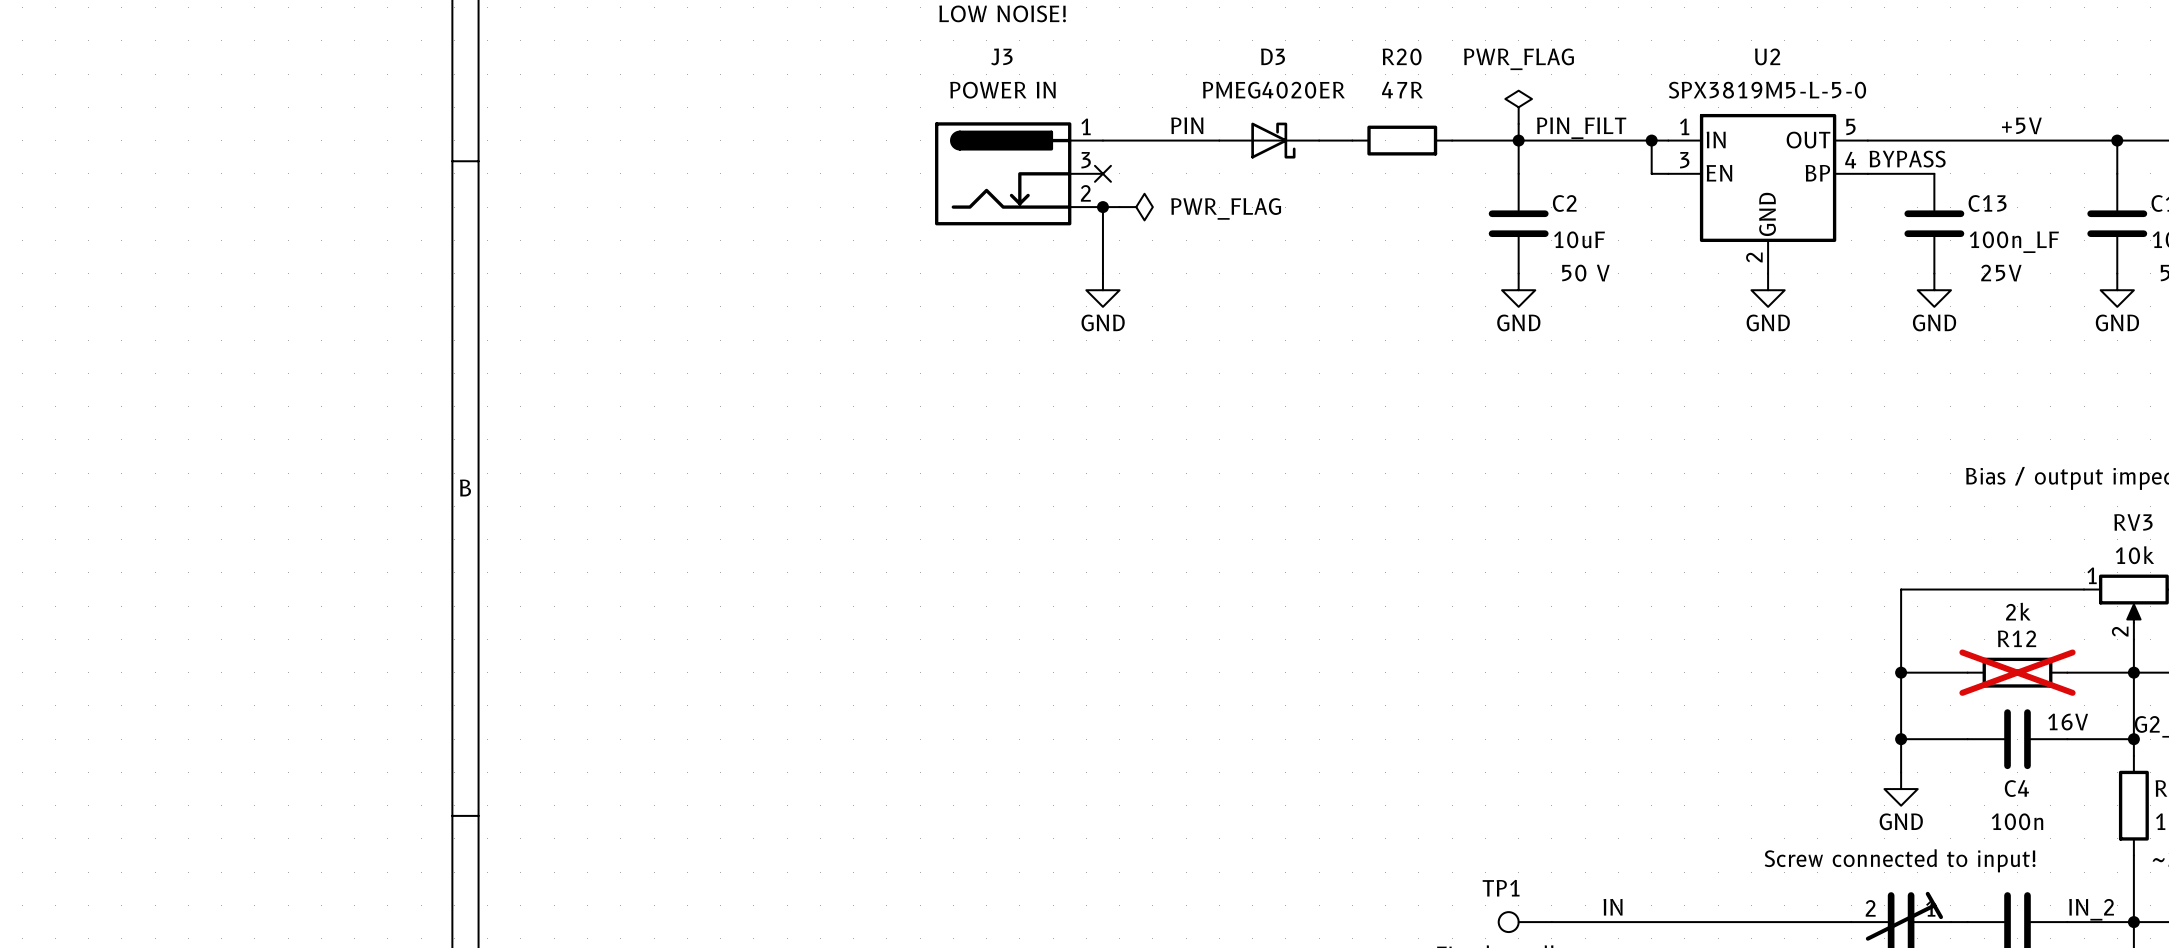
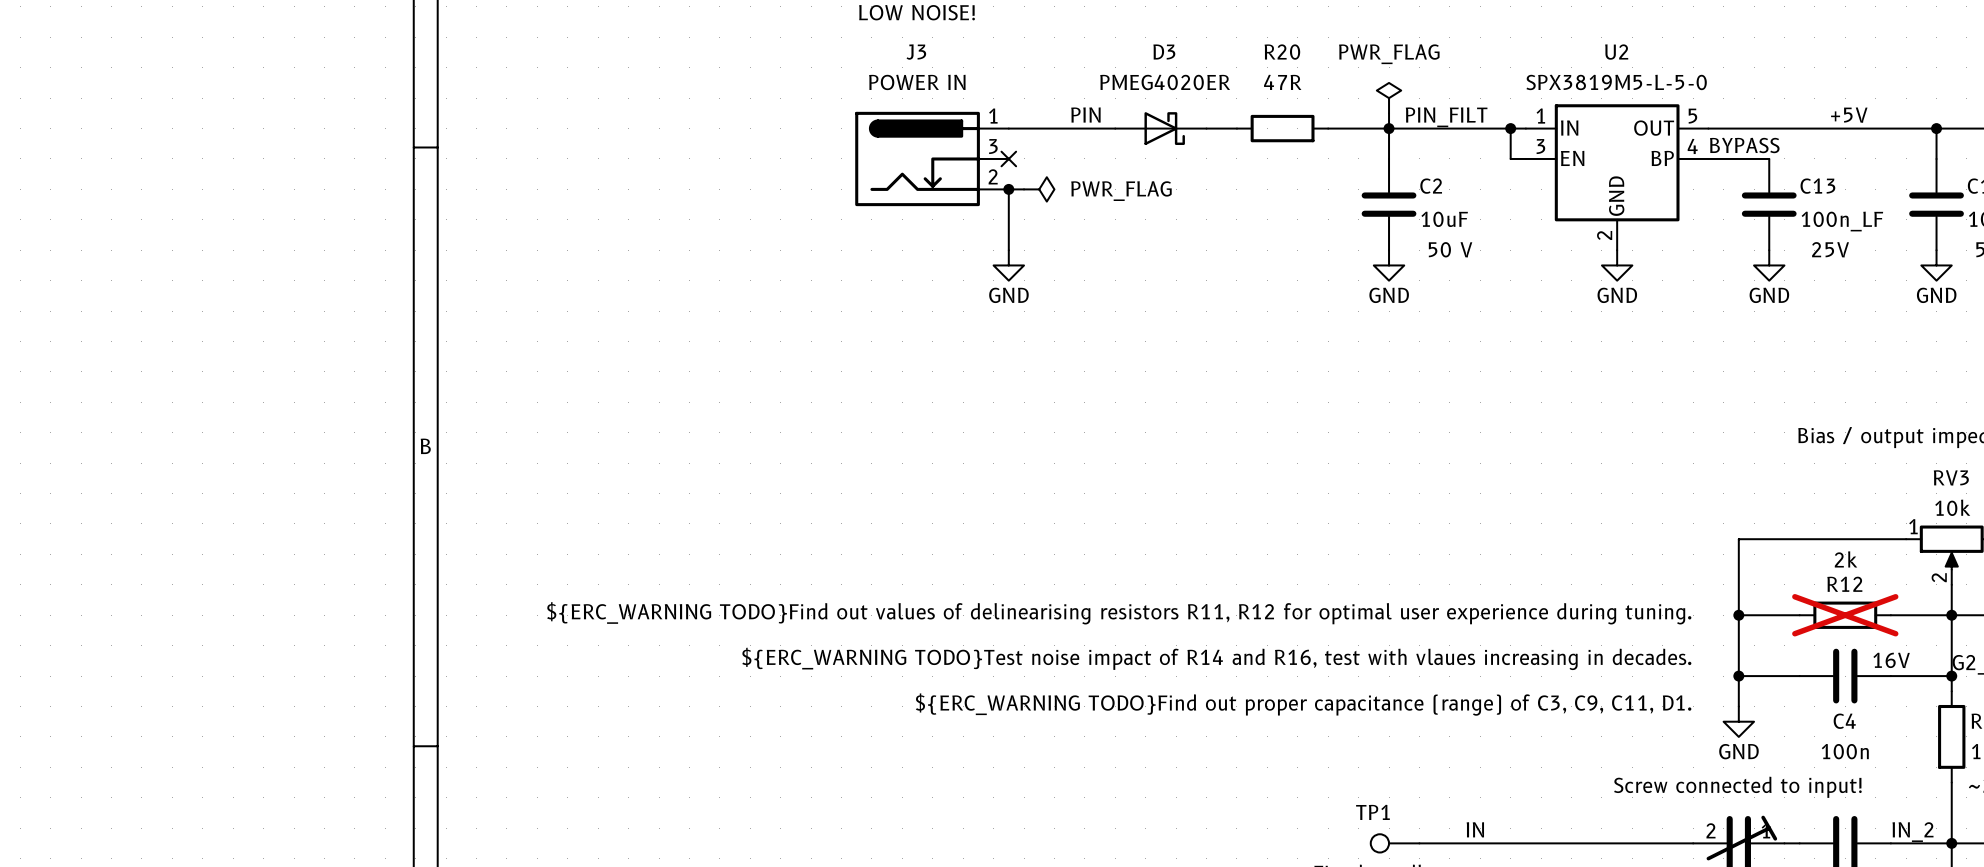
text: none -> ${ERC_WARNING TODO}Find out values of delinearising resistors R11, R12 for optimal user experience during tuning. (1119, 613)
text: none -> ${ERC_WARNING TODO}Test noise impact of R14 and R16, test with vlaues increasing in decades. (1216, 658)
text: none -> ${ERC_WARNING TODO}Find out proper capacitance (range) of C3, C9, C11, D1. (1303, 704)

